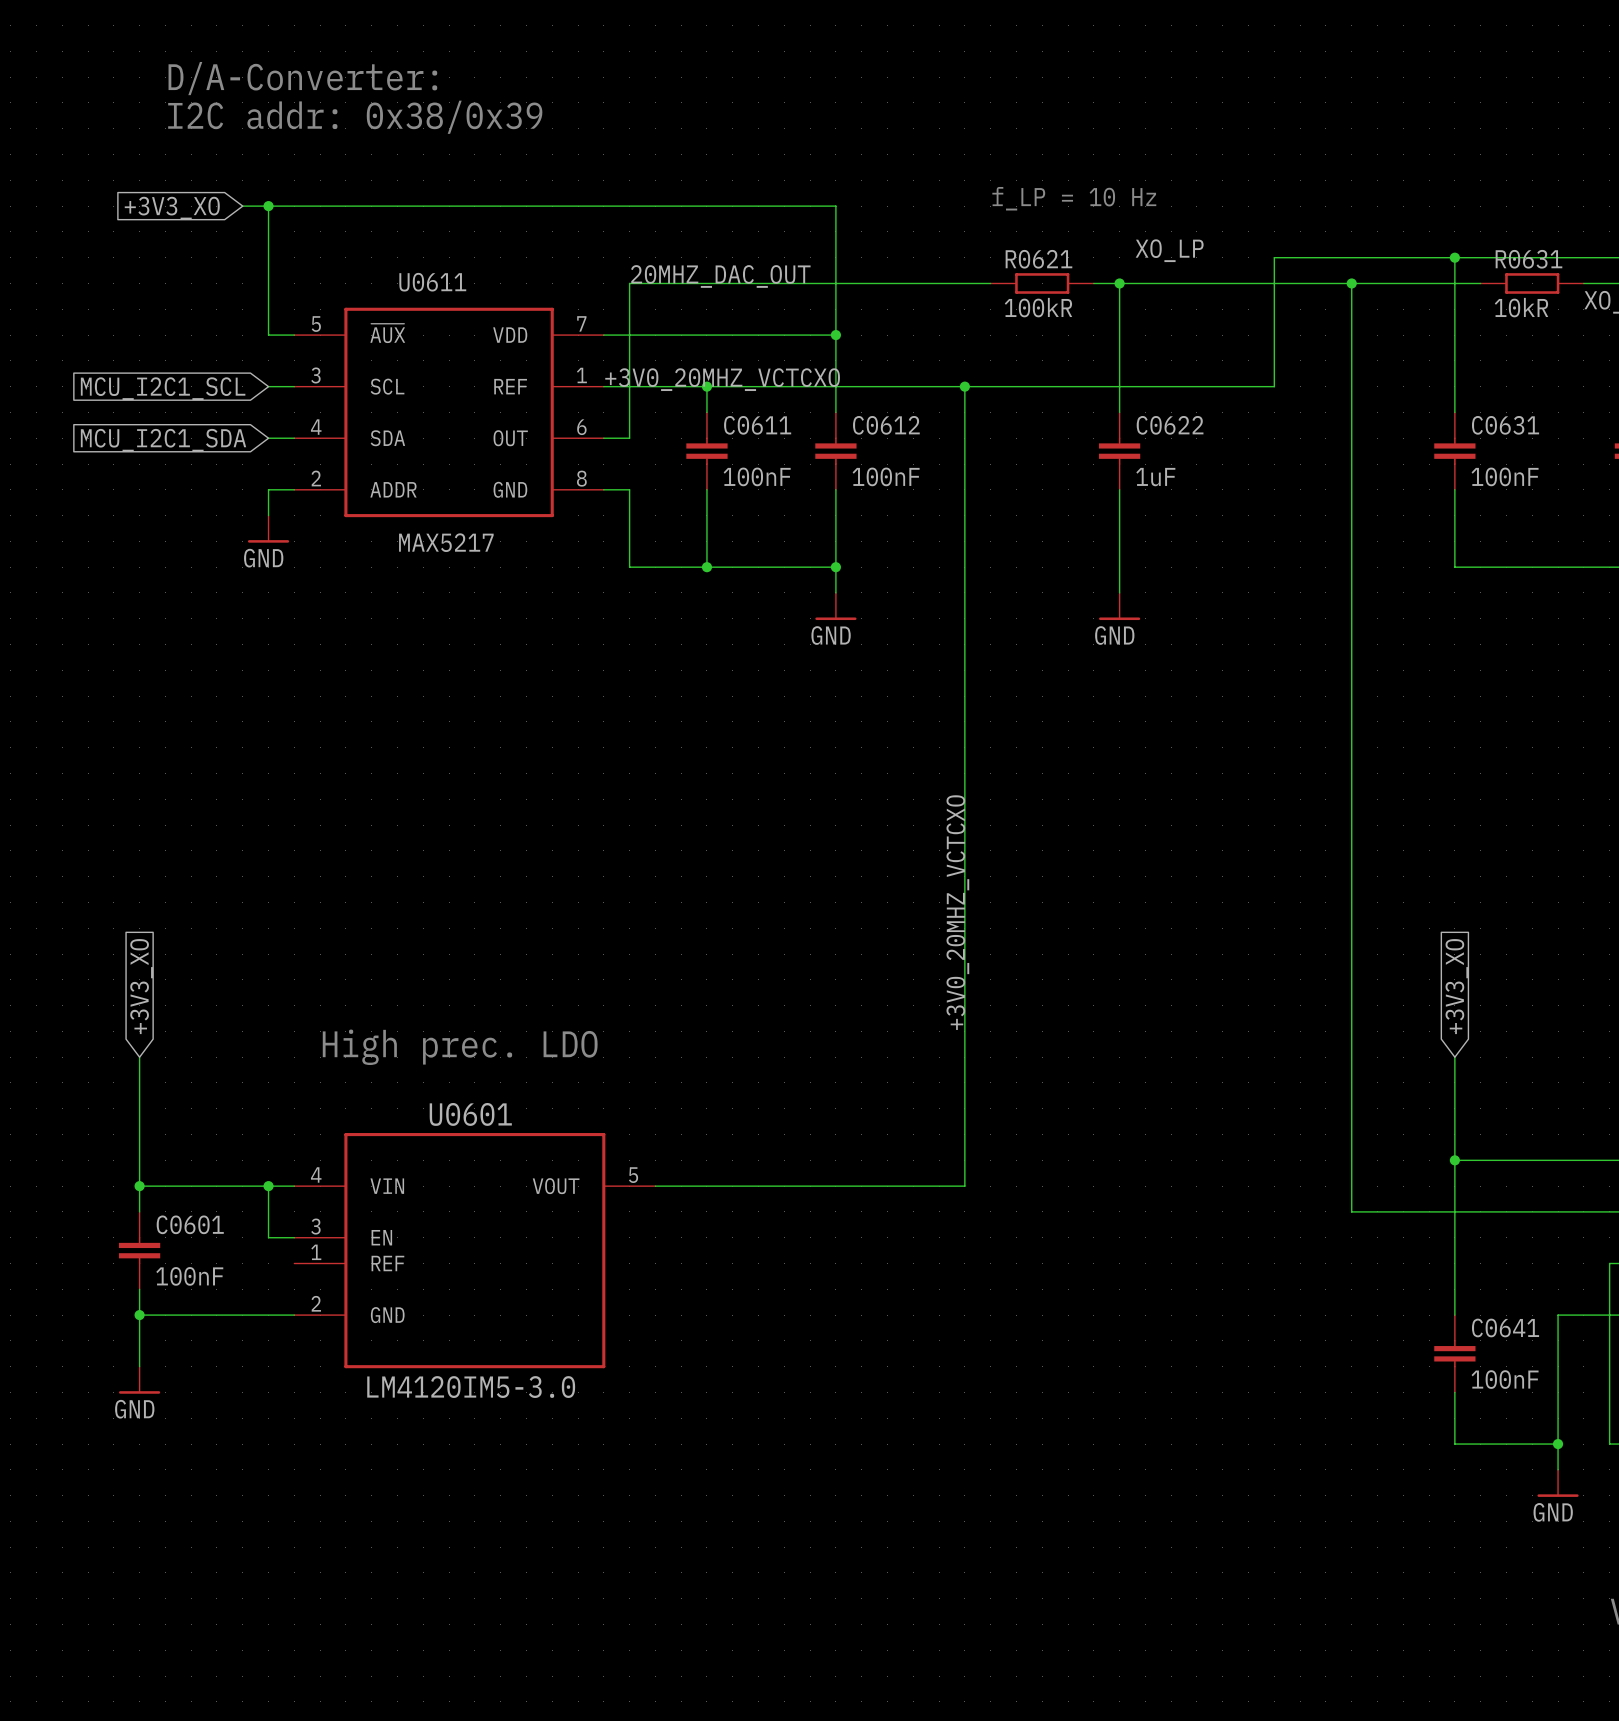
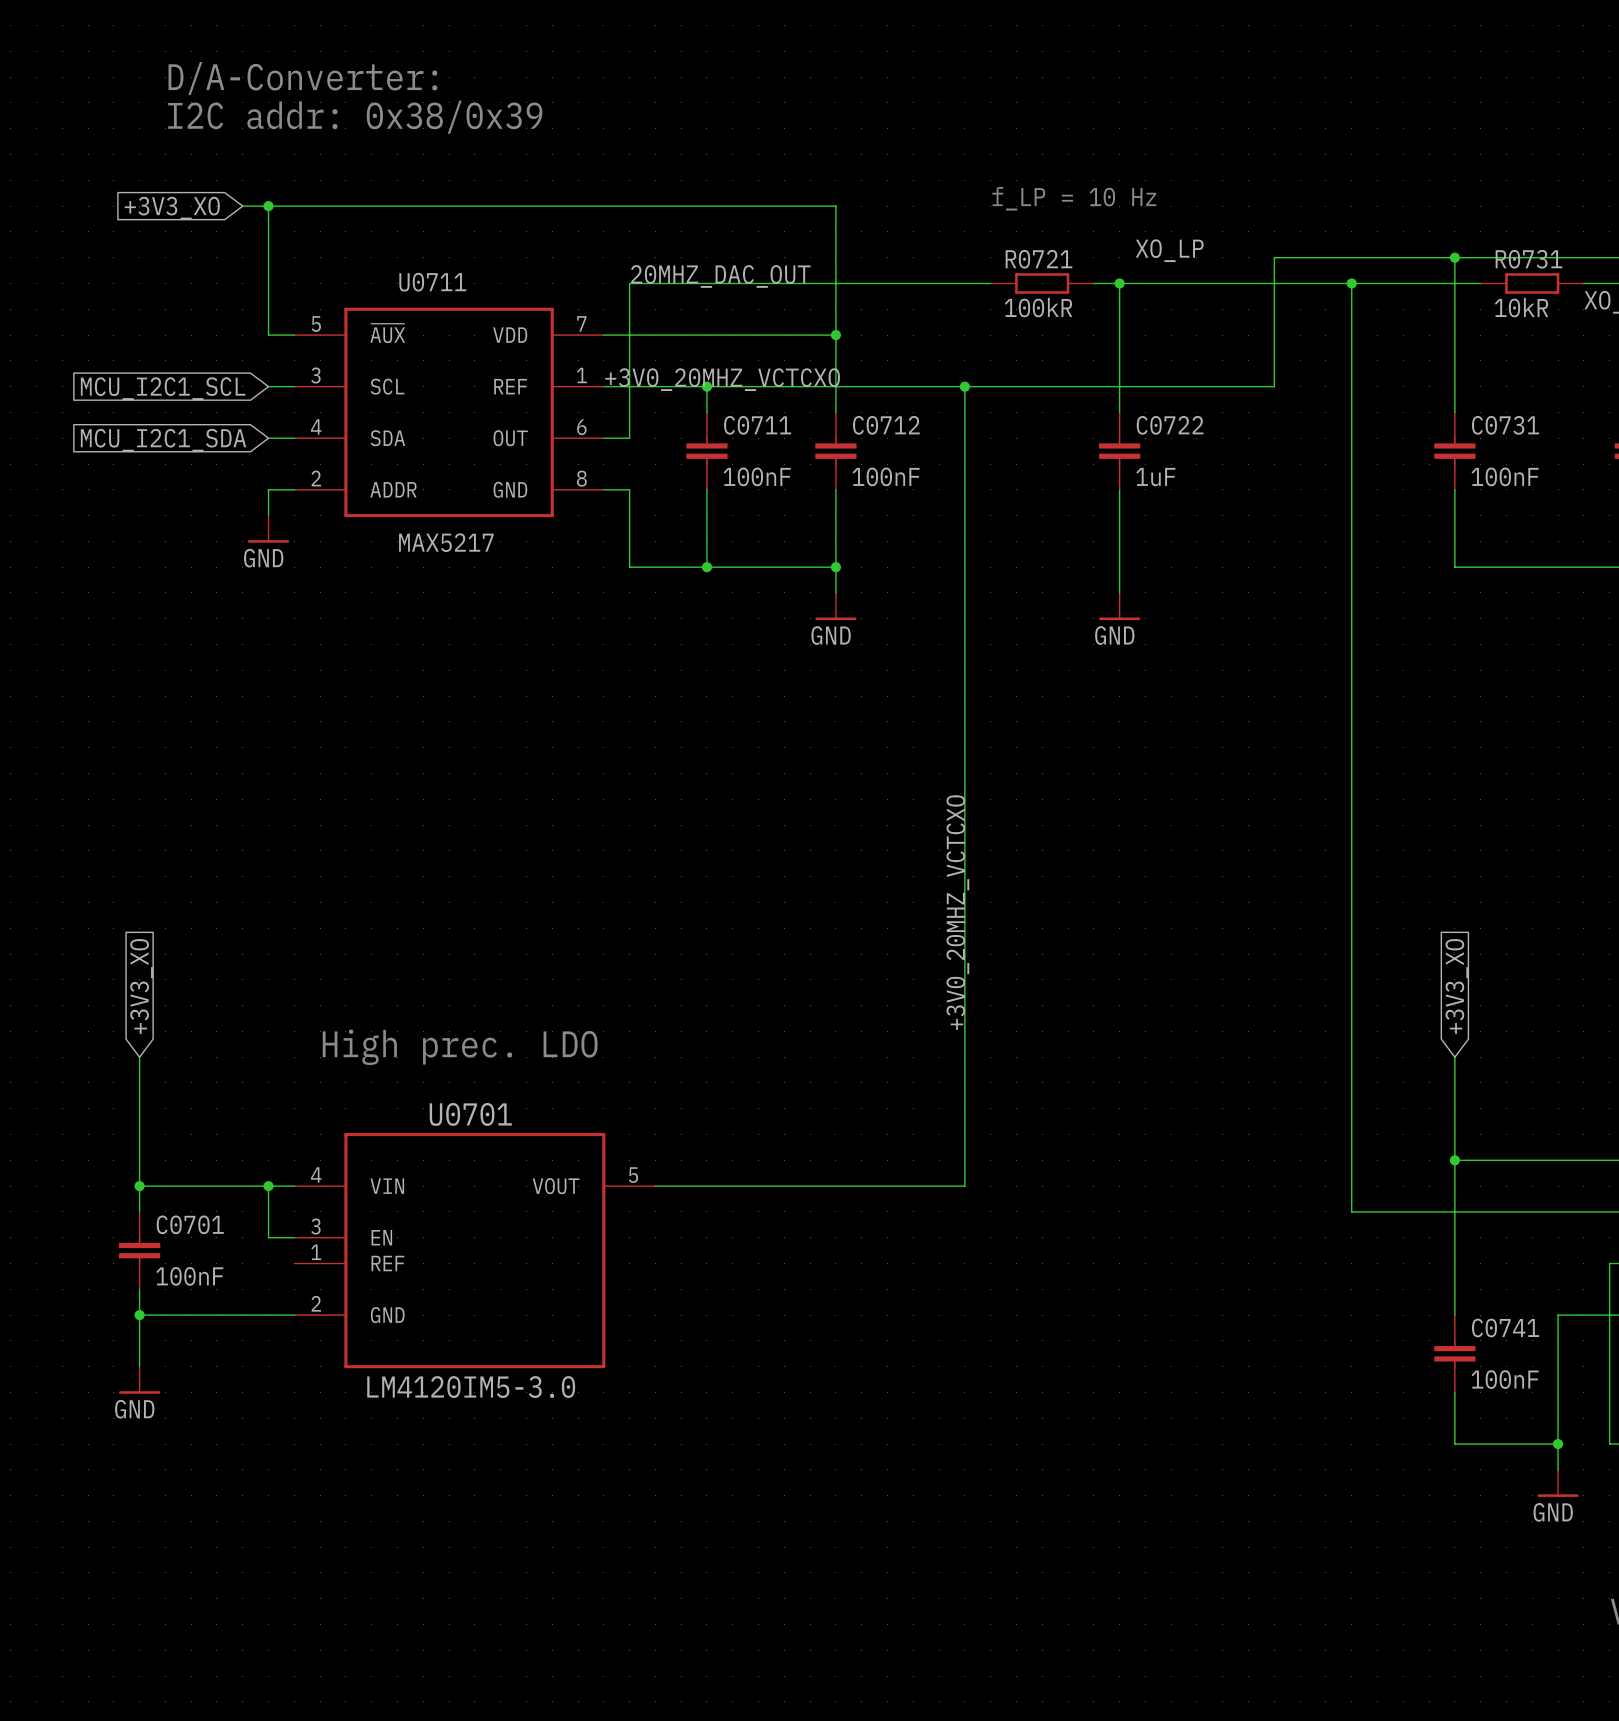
R0621 name: R0621 (1038, 259) -> R0721 (1038, 259)
R0631 name: R0631 (1528, 259) -> R0731 (1528, 259)
U0611 name: U0611 (432, 282) -> U0711 (432, 282)
C0611 name: C0611 (757, 425) -> C0711 (757, 425)
C0612 name: C0612 (886, 425) -> C0712 (886, 425)
C0622 name: C0622 (1170, 425) -> C0722 (1170, 425)
C0631 name: C0631 (1505, 425) -> C0731 (1505, 425)
U0601 name: U0601 (470, 1114) -> U0701 (470, 1114)
C0601 name: C0601 (190, 1224) -> C0701 (190, 1224)
C0641 name: C0641 (1505, 1327) -> C0741 (1505, 1327)

